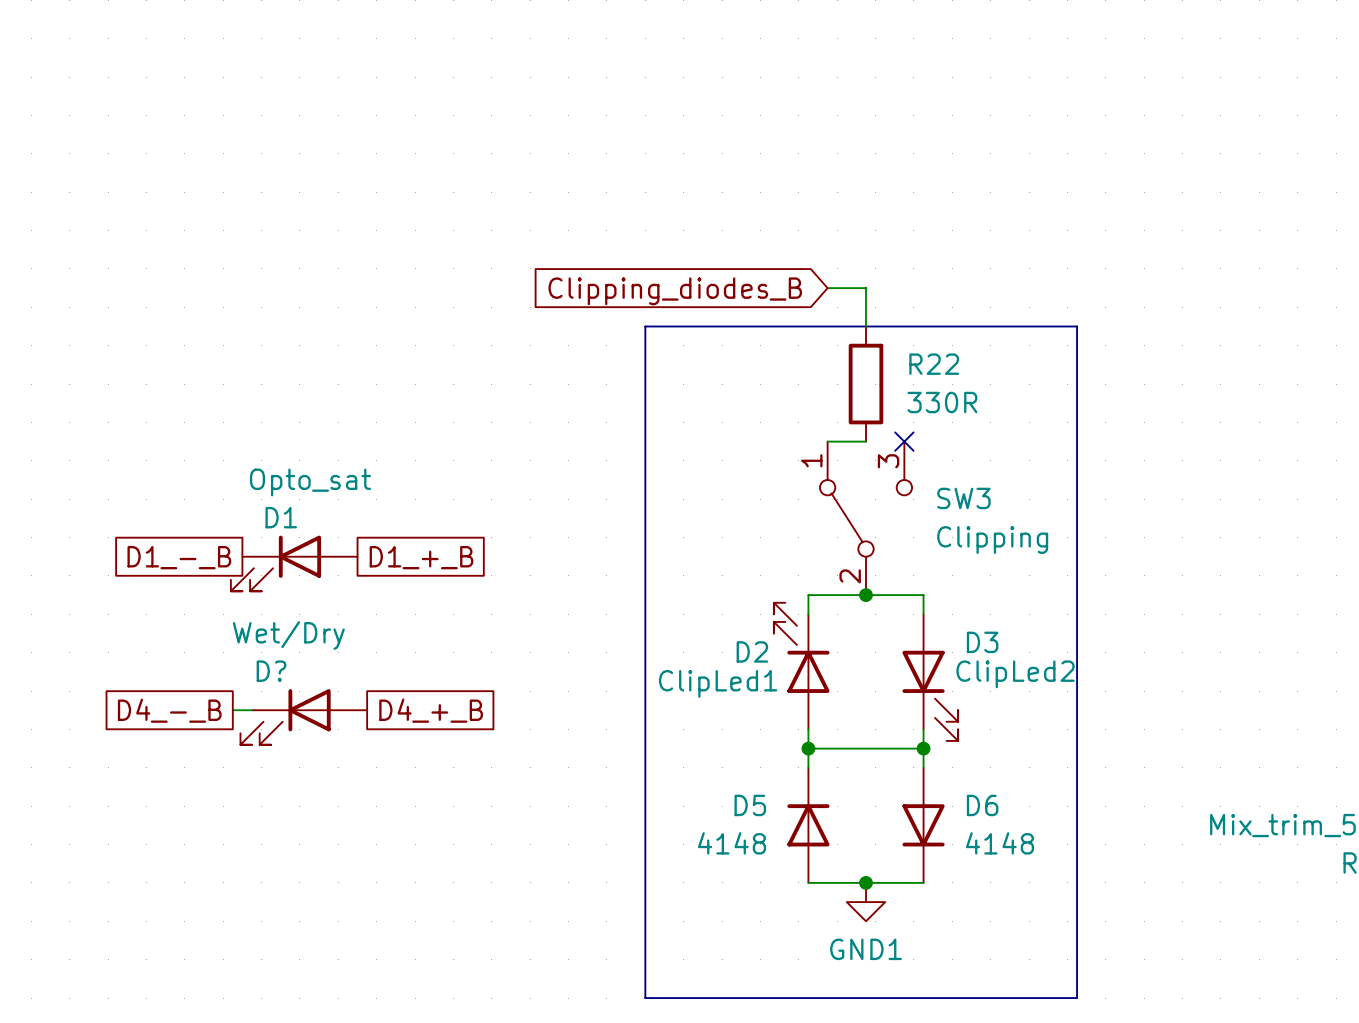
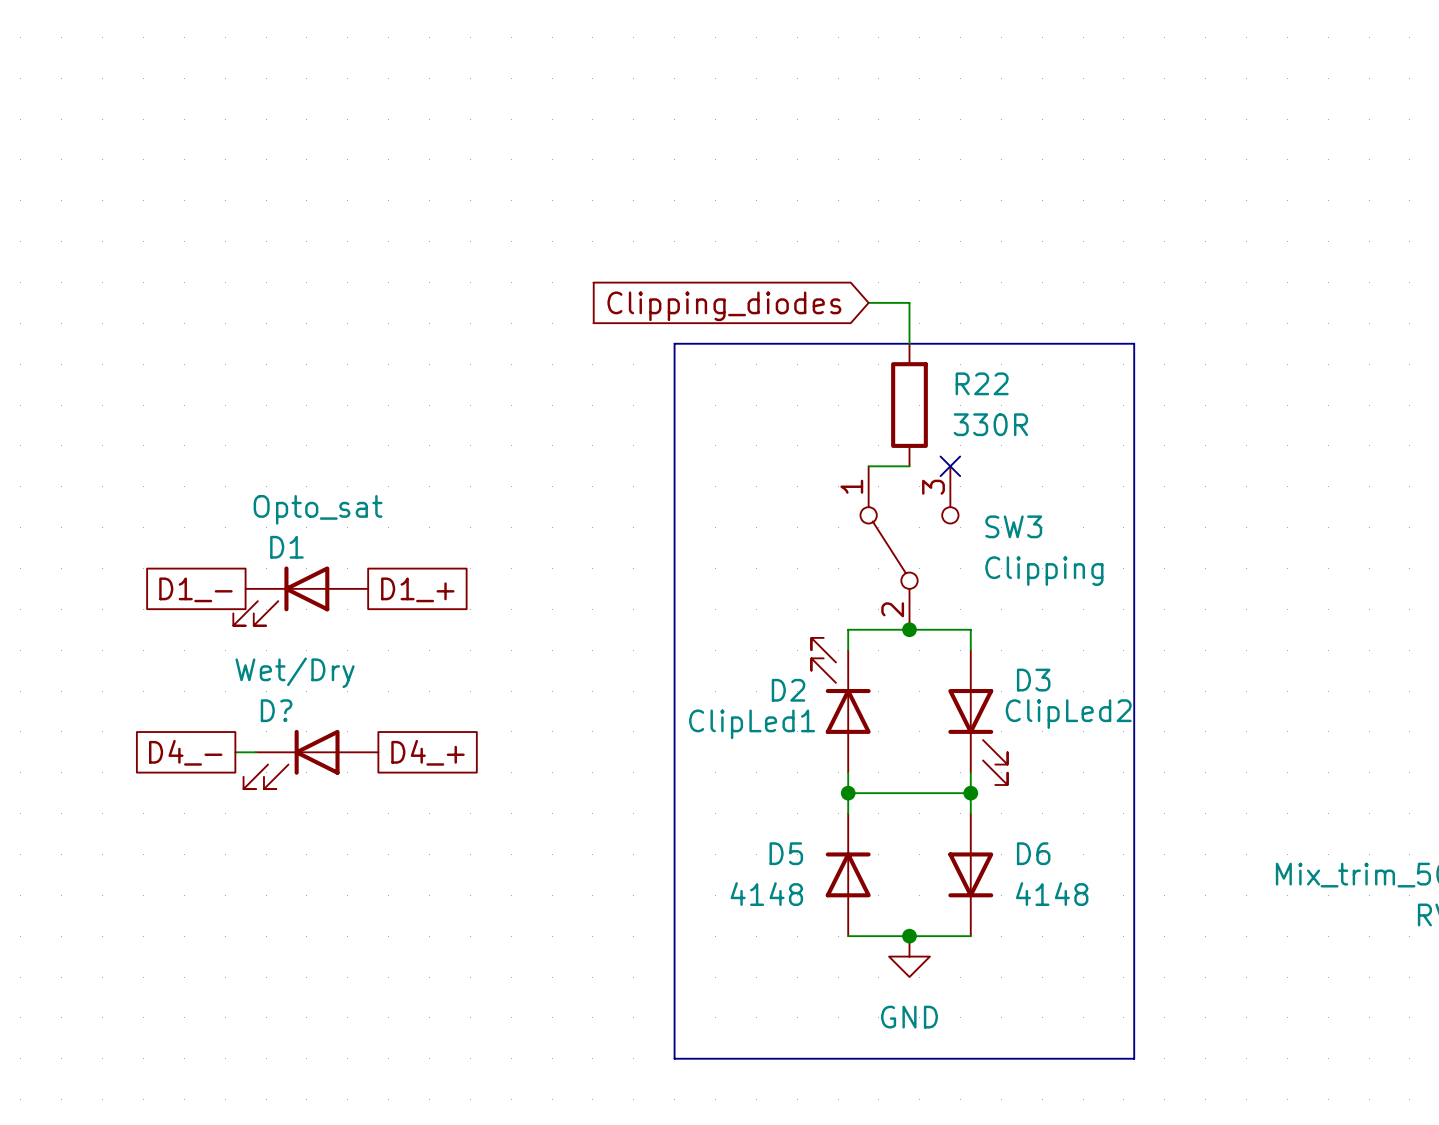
global label: Clipping_diodes_B (675, 291) -> Clipping_diodes (724, 306)
global label: D1_-_B (179, 557) -> D1_- (195, 589)
global label: D1_+_B (421, 557) -> D1_+ (417, 589)
global label: D4_-_B (169, 710) -> D4_- (185, 752)
global label: D4_+_B (431, 710) -> D4_+ (428, 752)
power symbol: GND1 (865, 902) -> GND (909, 956)

